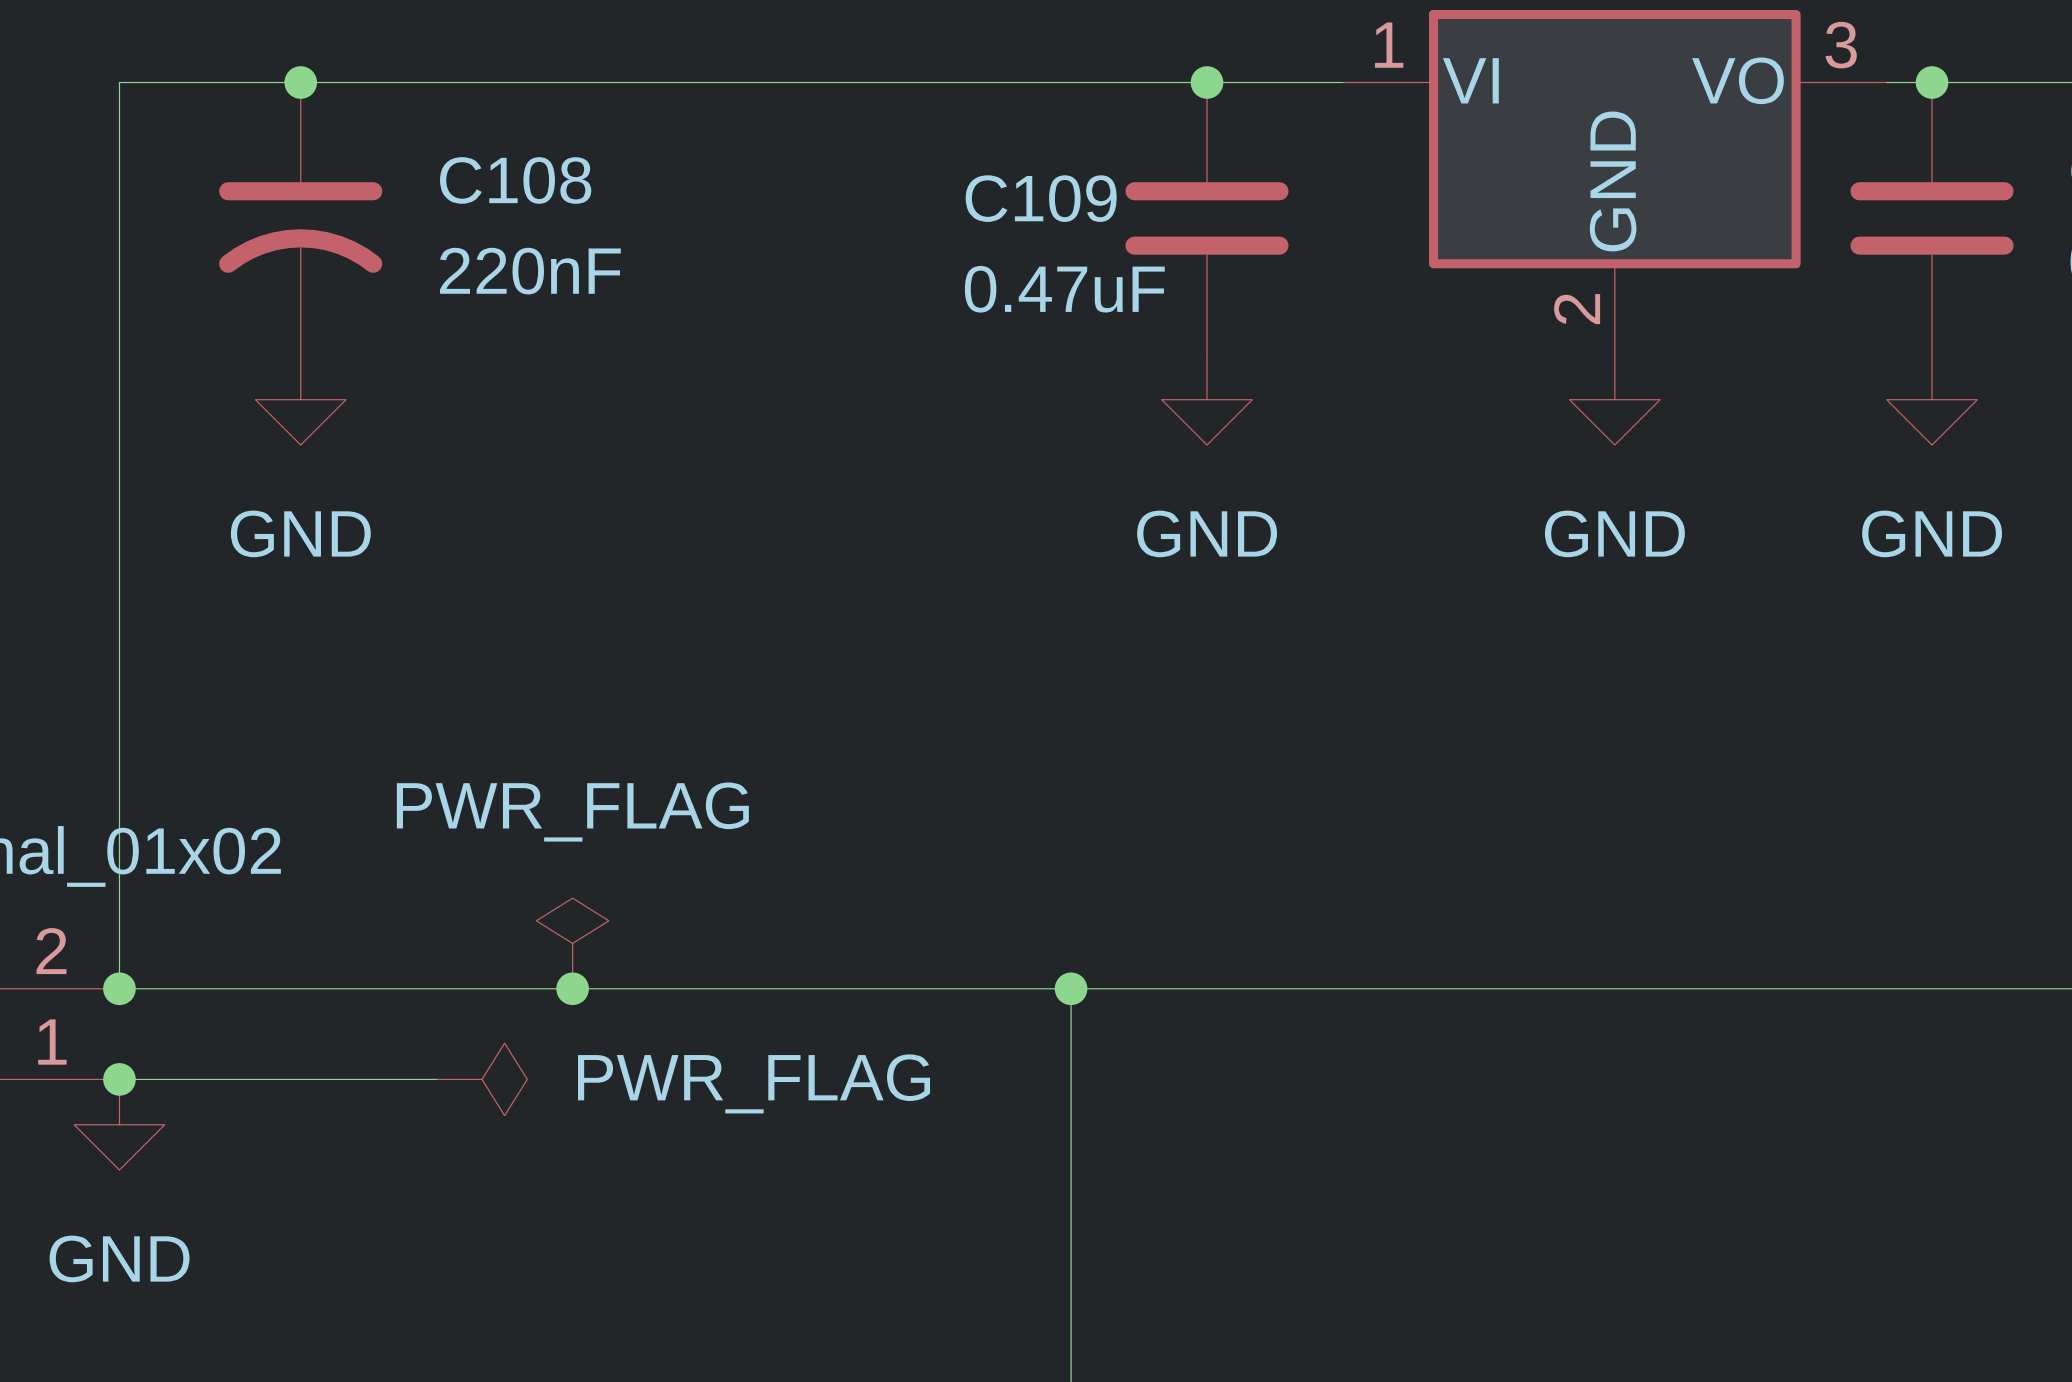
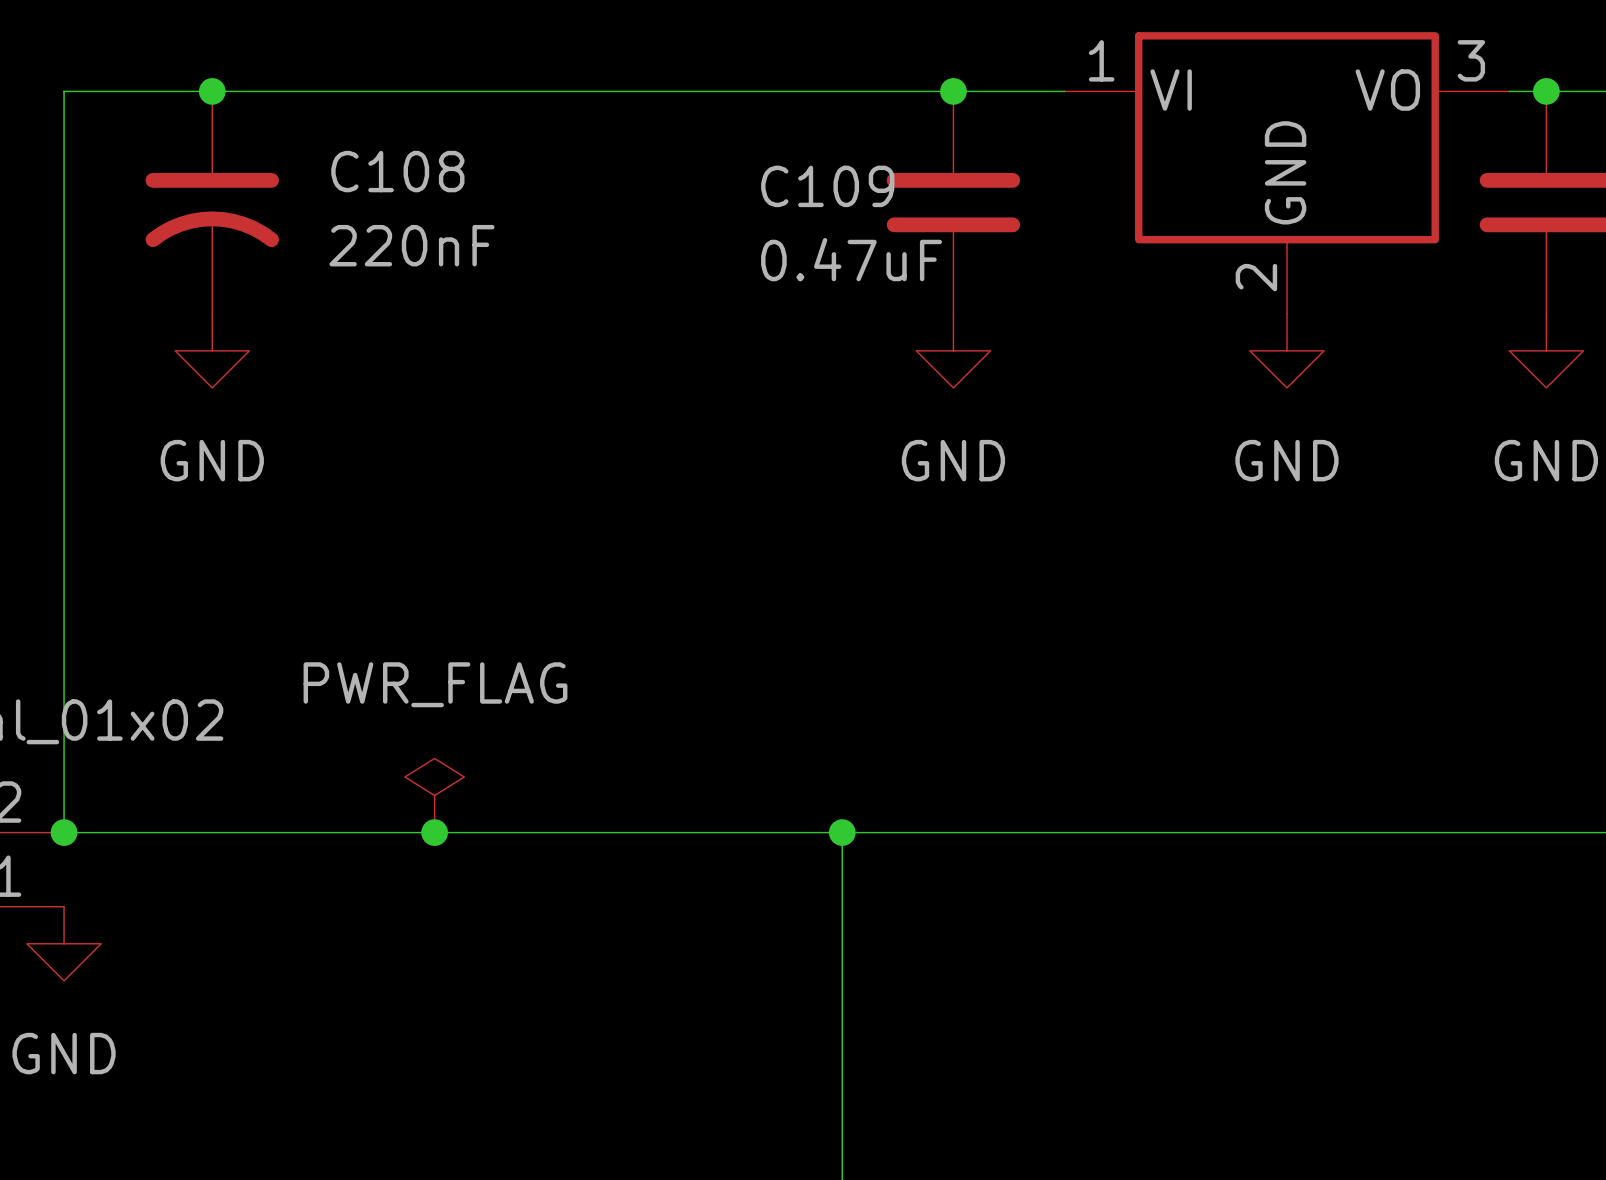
wire: (119, 1079) (436, 1079) -> none
junction: (119, 1079) -> none
power symbol: PWR_FLAG (481, 1079) -> none

